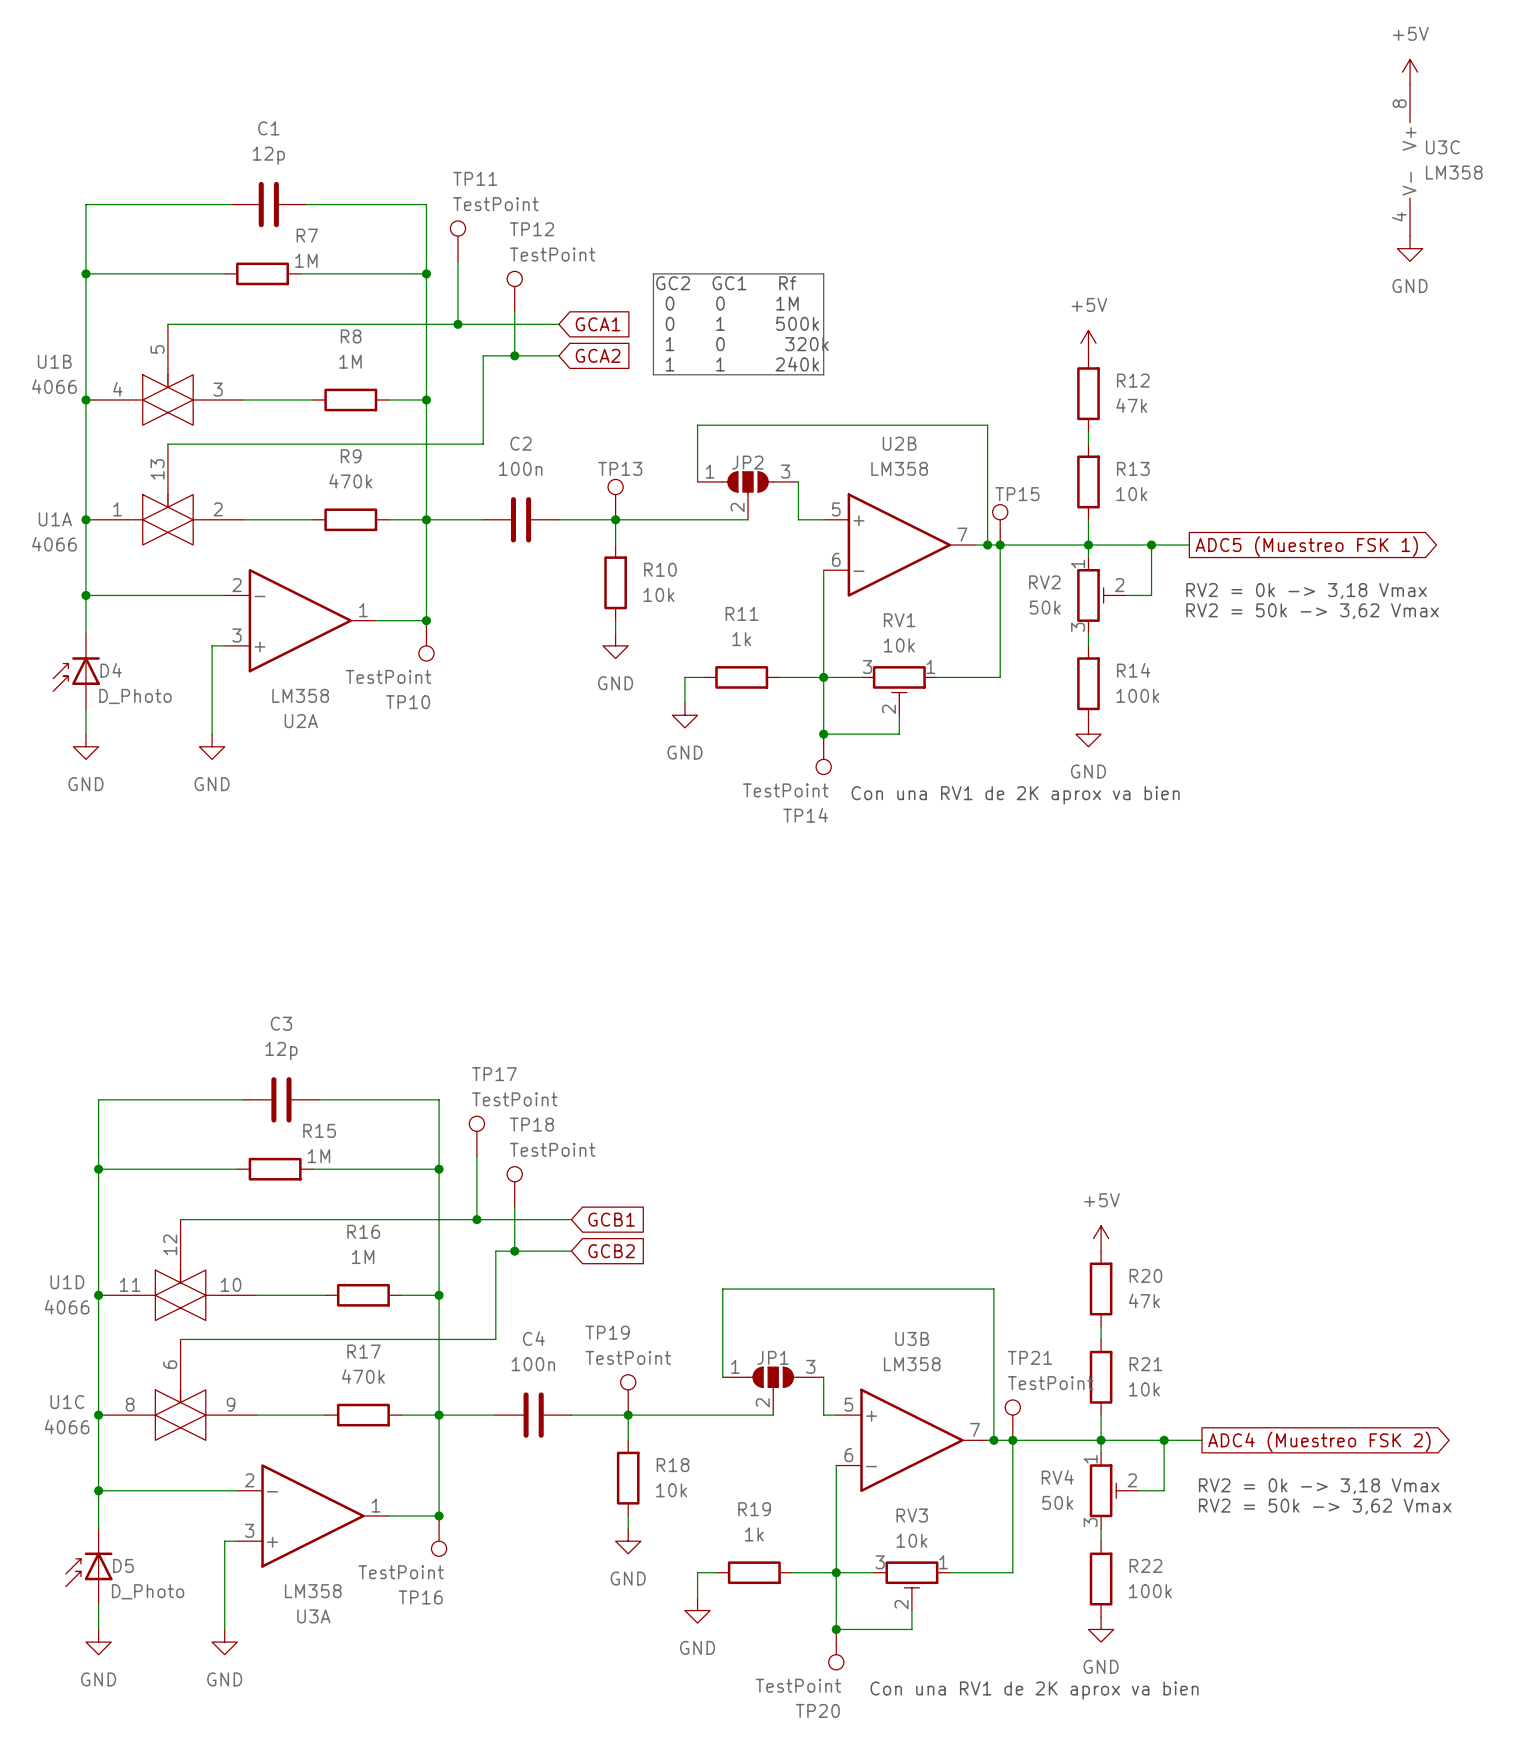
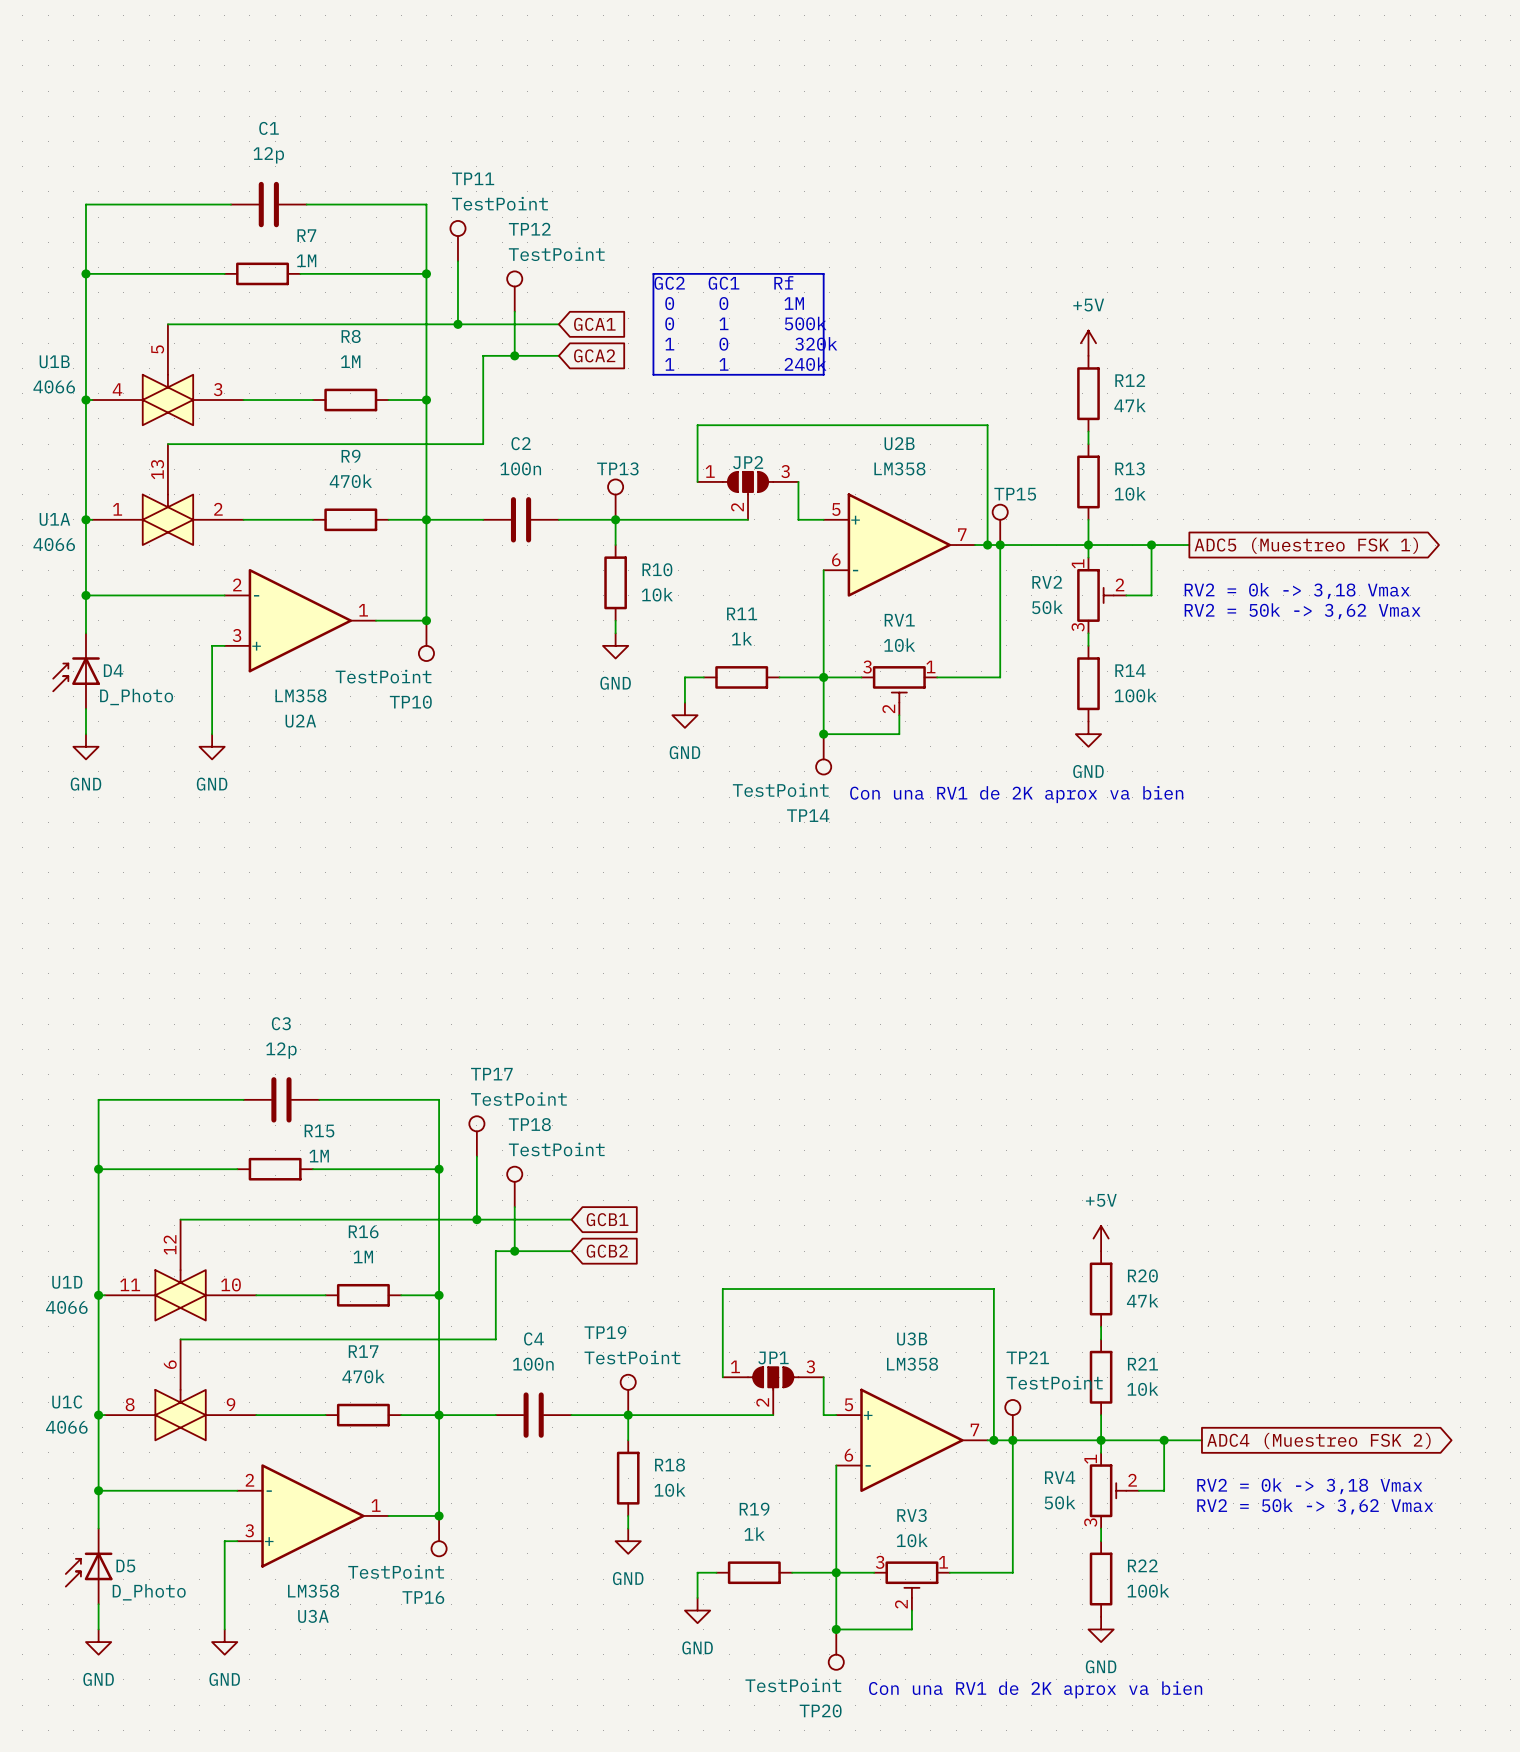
power symbol: +5V (1410, 72) -> none
U3C: LM358 (1410, 160) -> none
power symbol: GND (1410, 248) -> none

